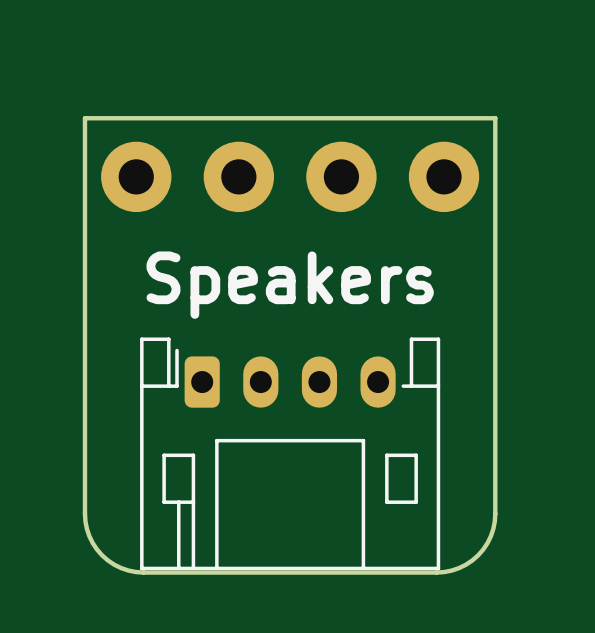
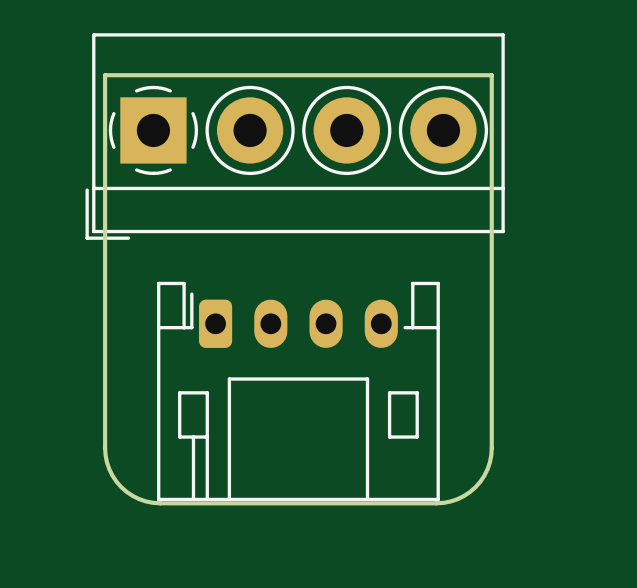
part footprint: [101, 141, 480, 213] -> [85, 33, 505, 240]
text: Speakers (290, 285) -> none

